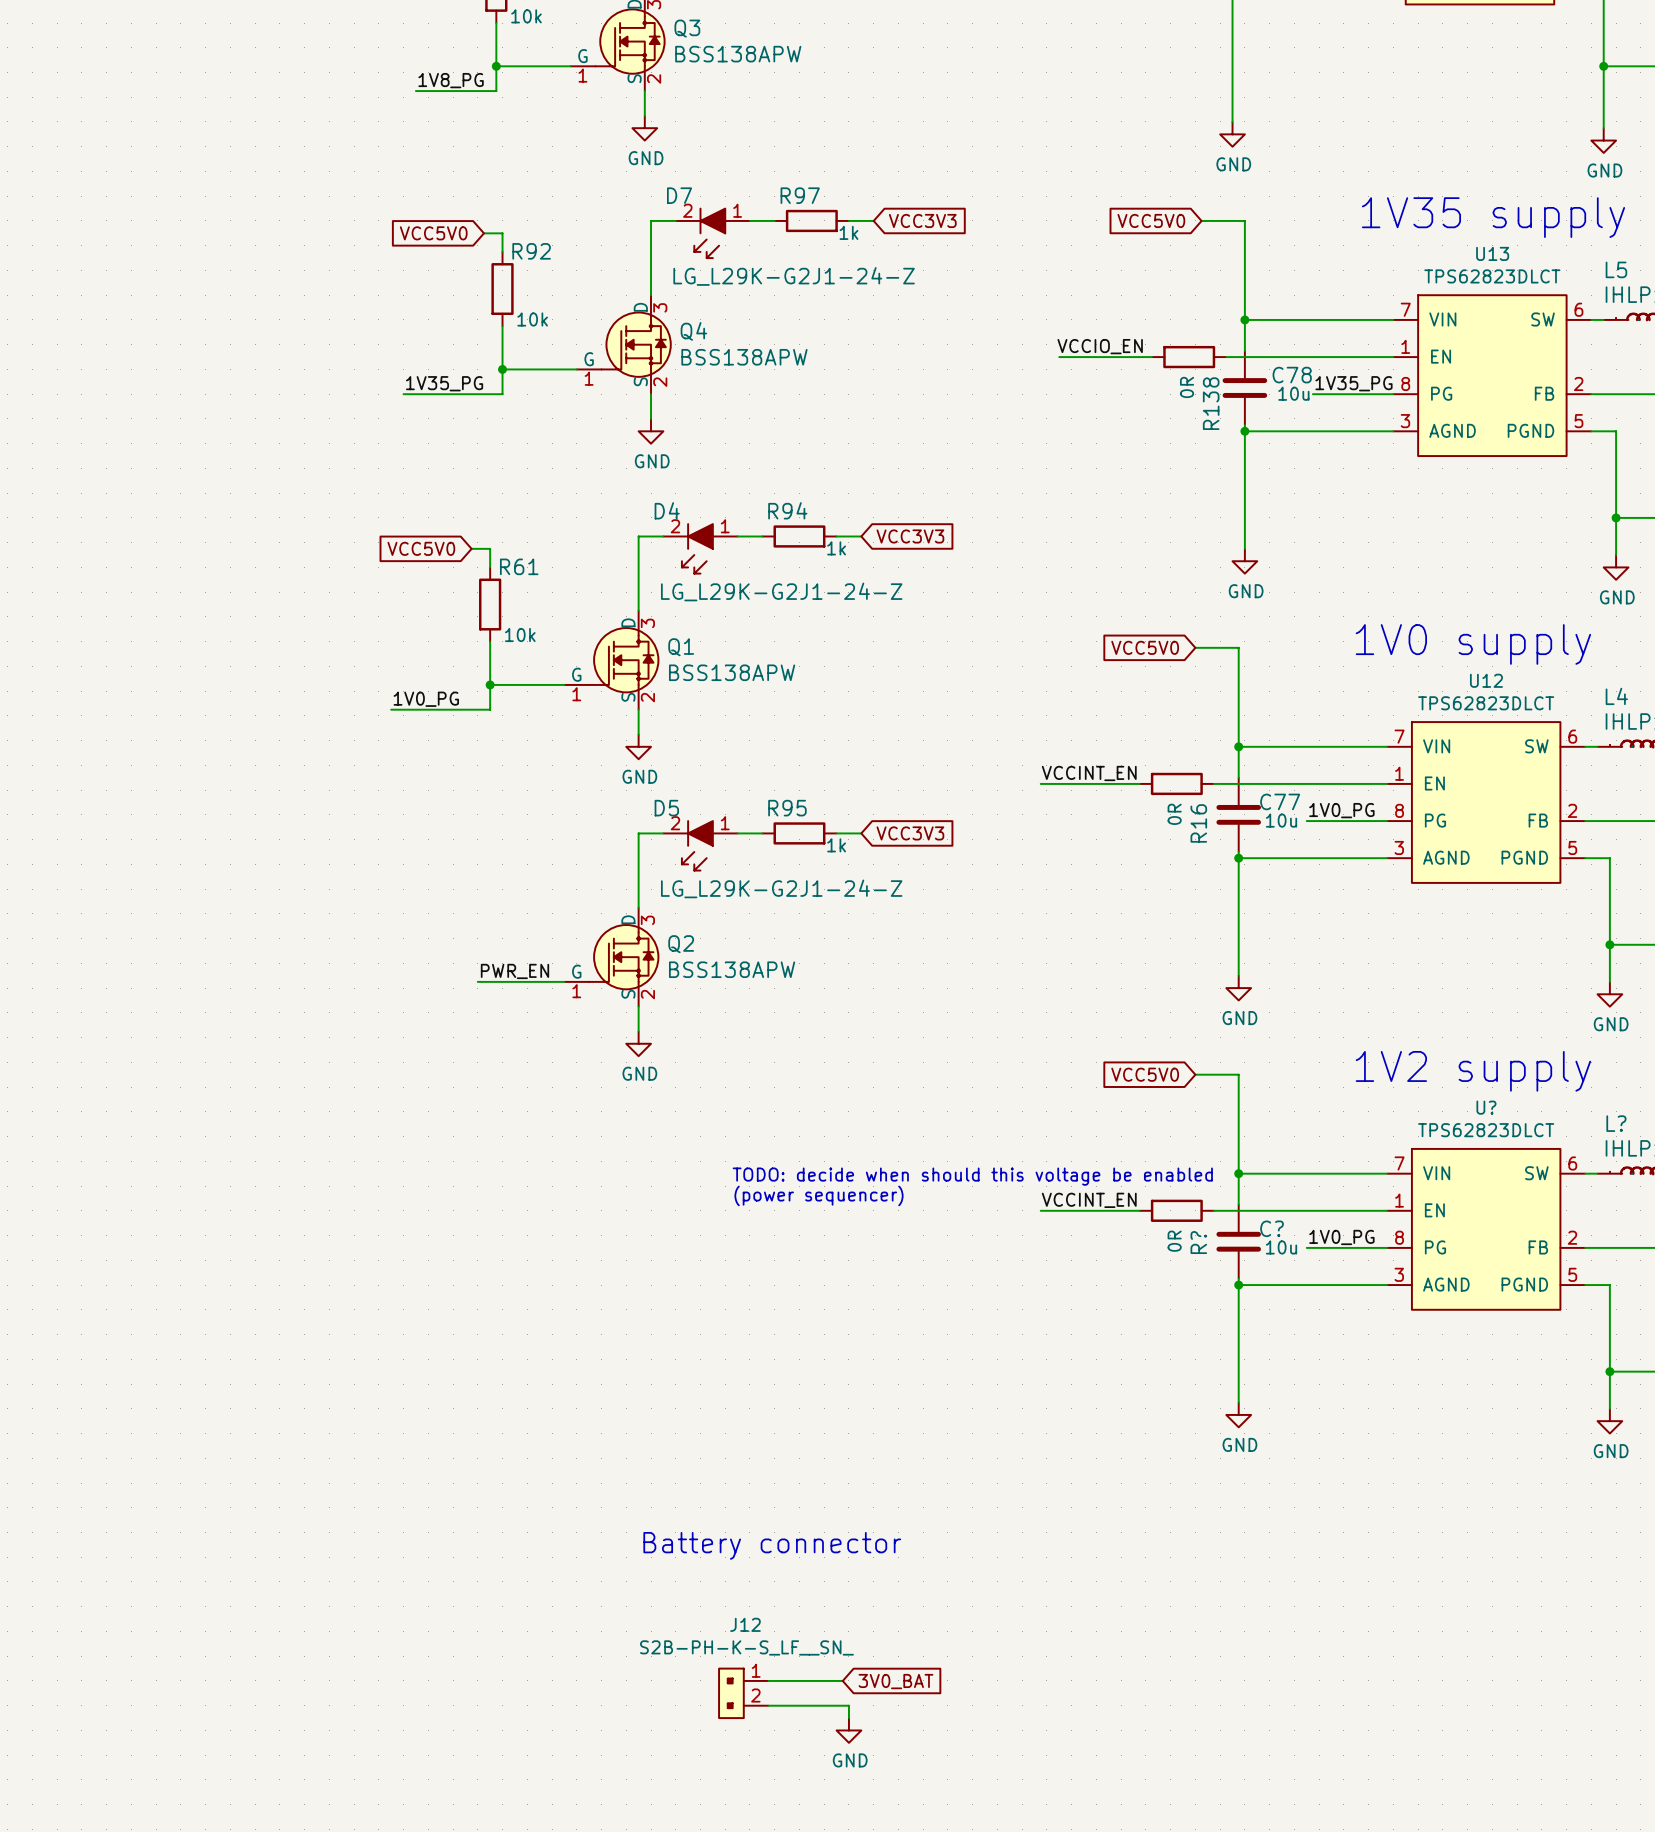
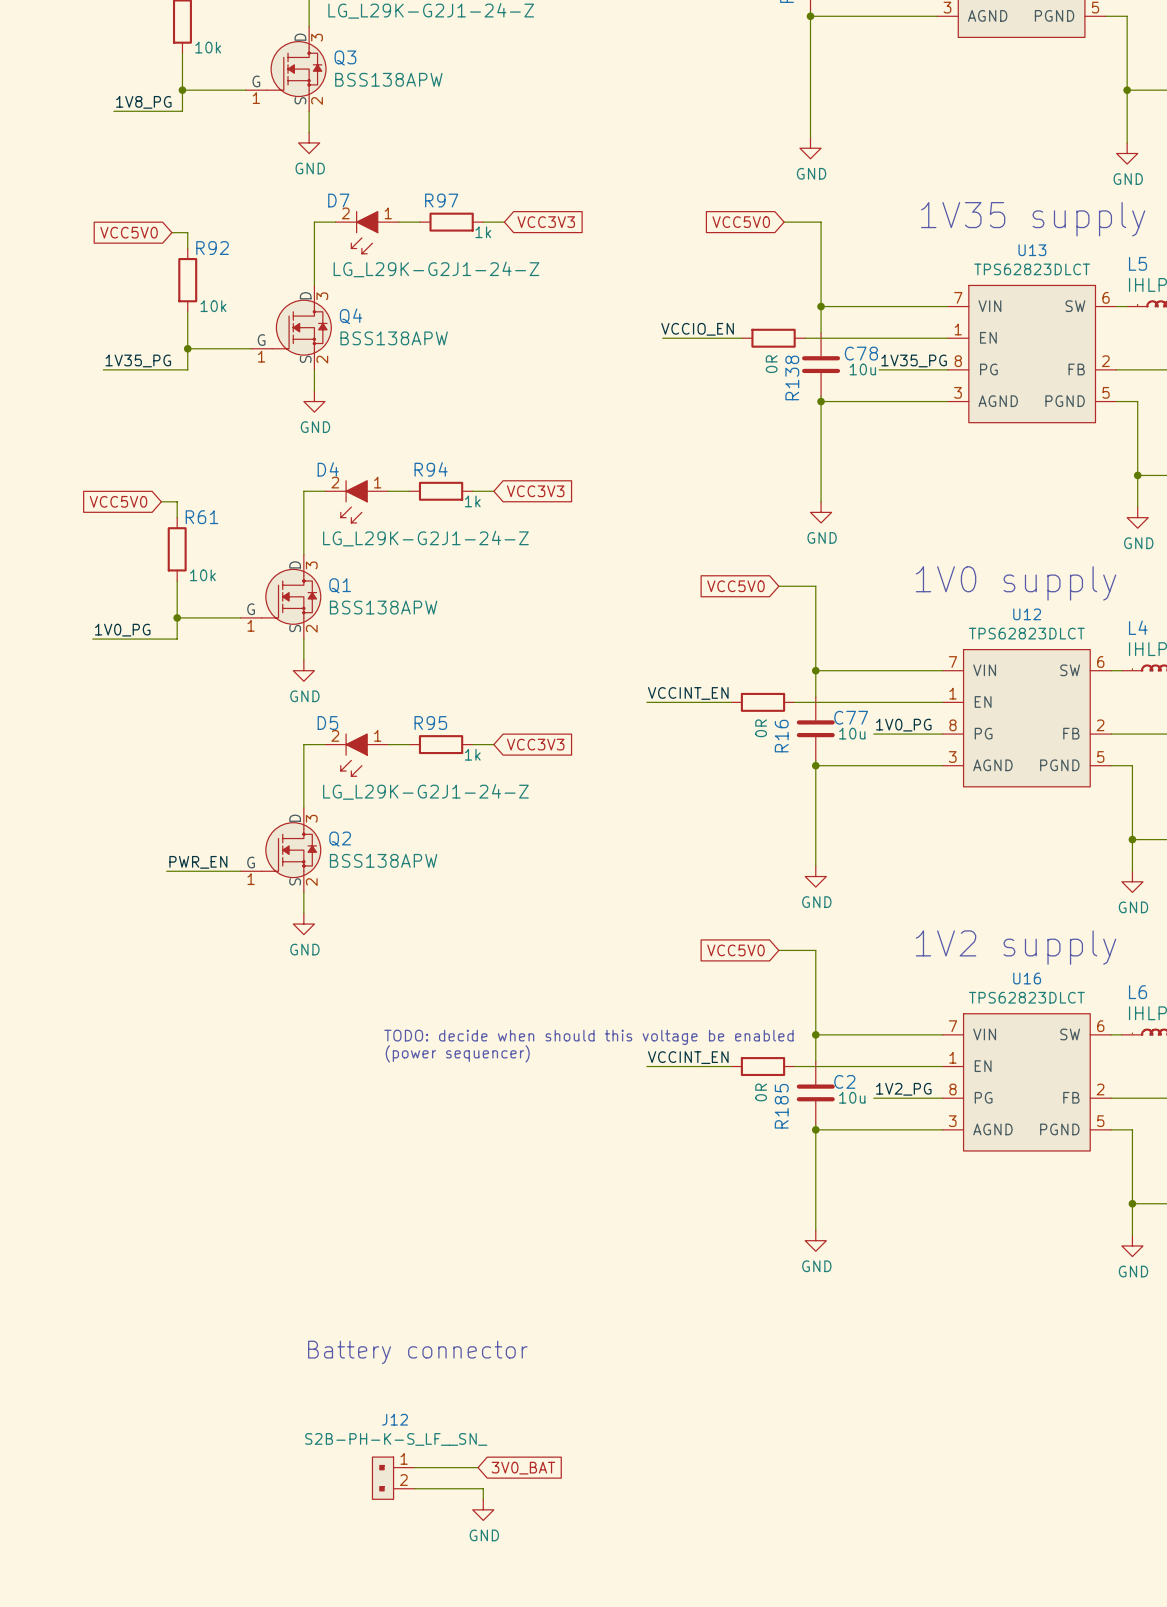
U? name: U? (1486, 1107) -> U16 (1027, 978)
L? name: L? (1616, 1123) -> L6 (1138, 992)
C? name: C? (1272, 1228) -> C2 (844, 1081)
label: 1V0_PG (1341, 1237) -> 1V2_PG (903, 1089)
R? name: R? (1198, 1242) -> R185 (781, 1106)

